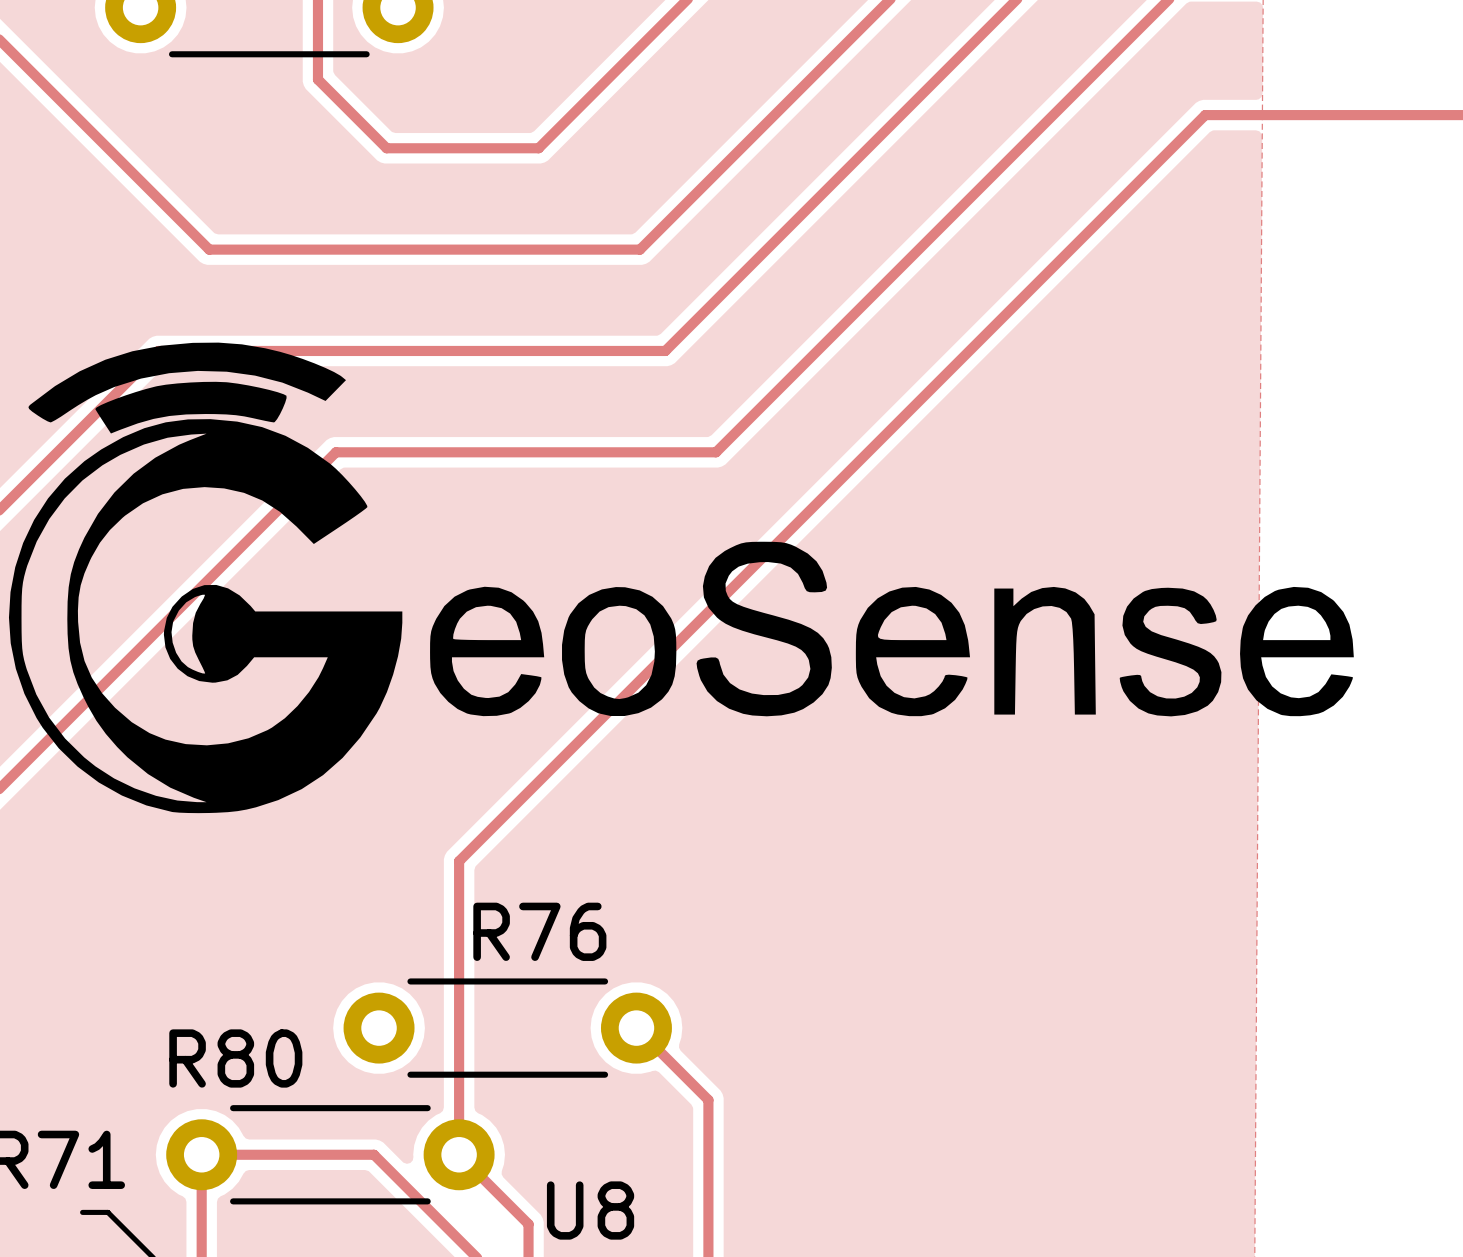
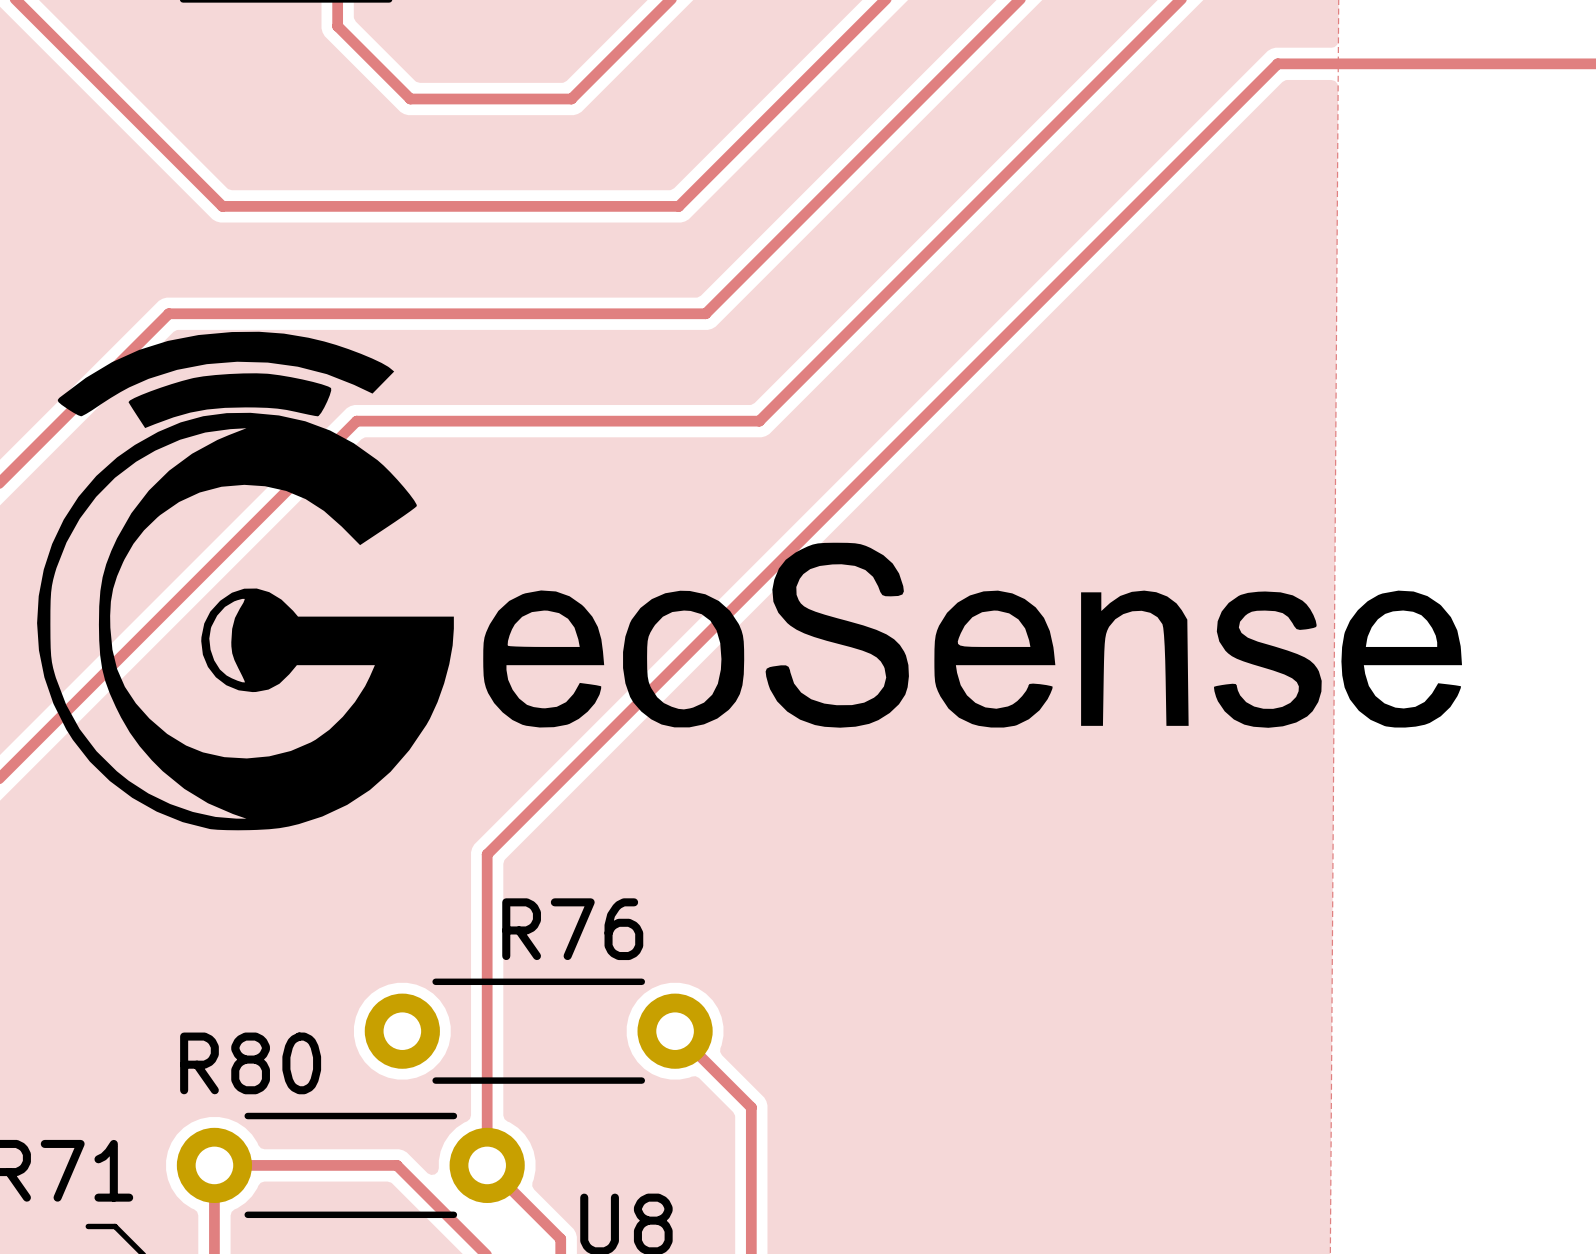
drawing position: (681, 577) -> (749, 581)

